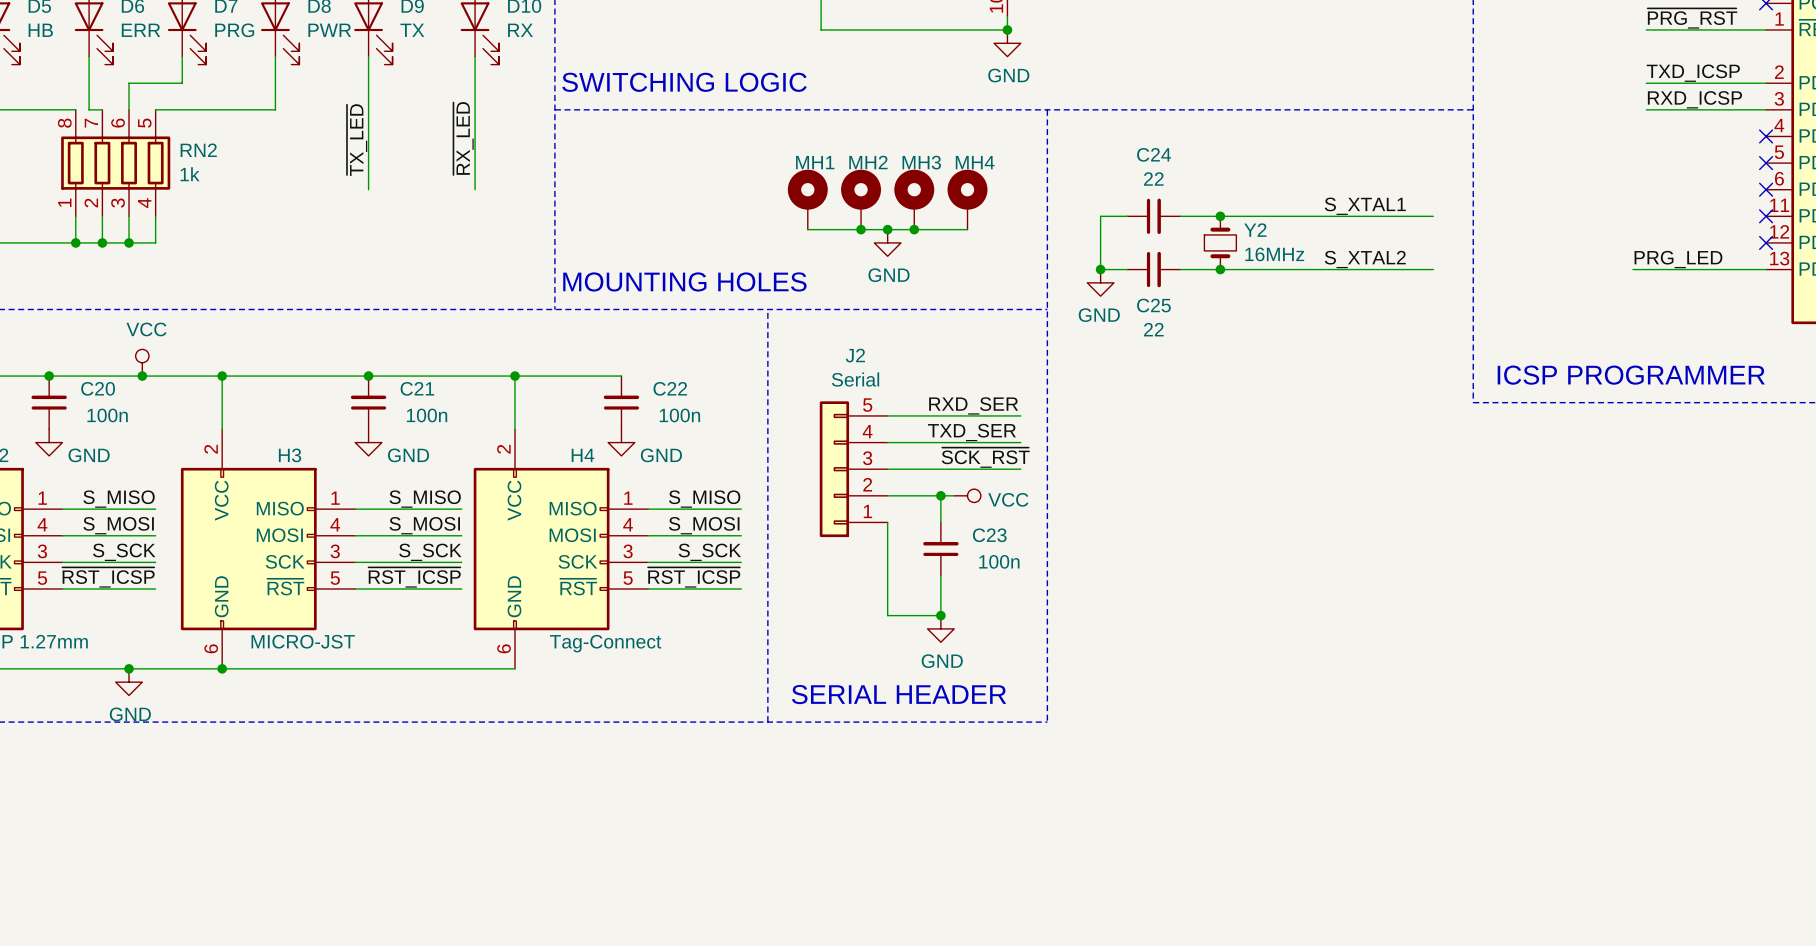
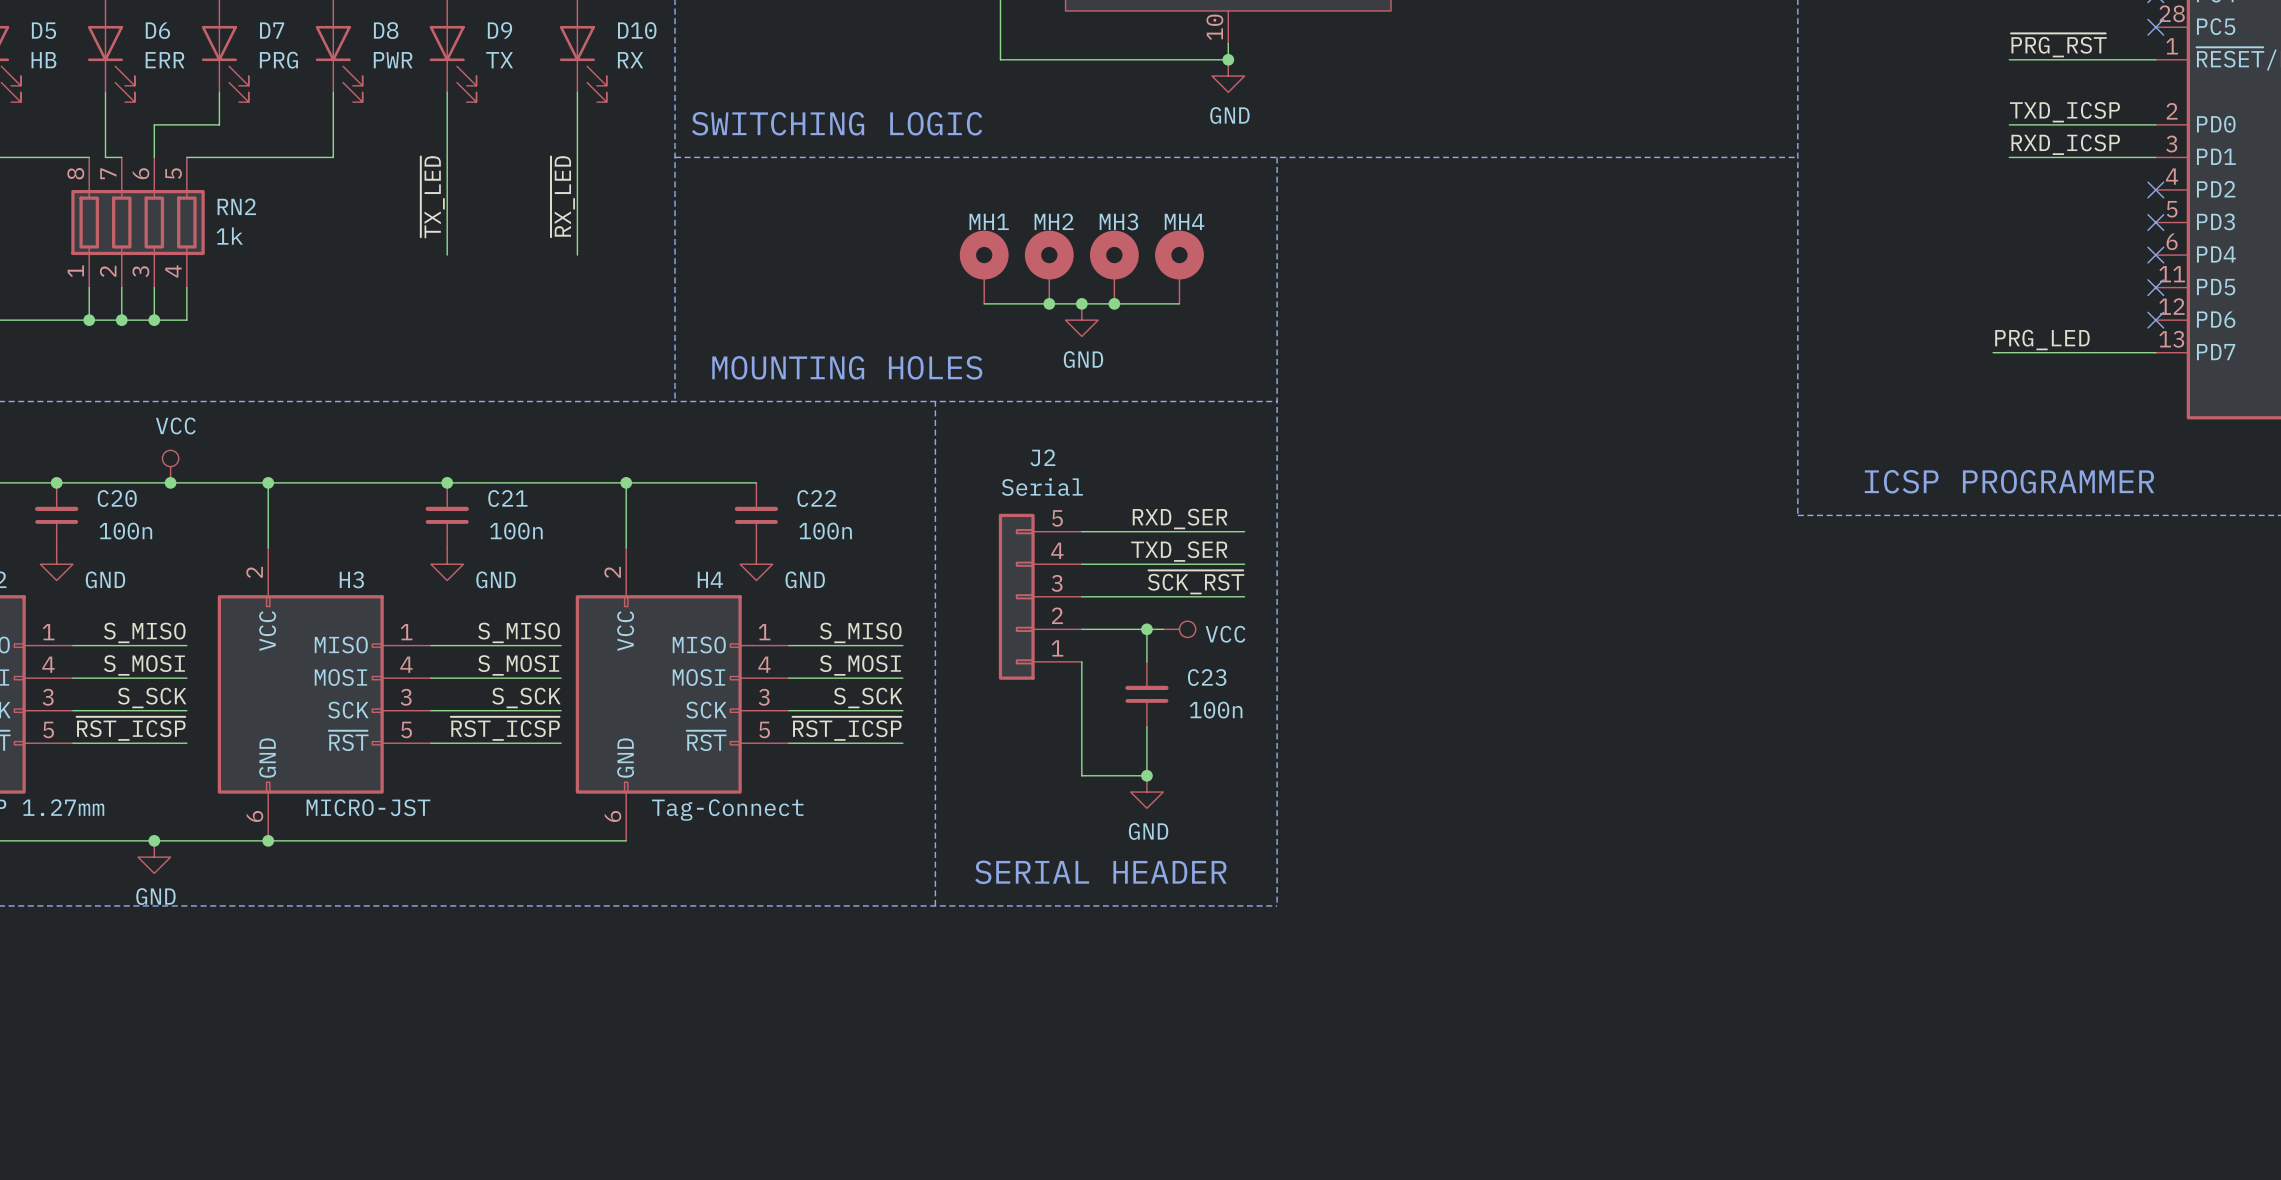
label: S_XTAL1 (1365, 206) -> none
wire: (1127, 216) (1100, 216) (1100, 269) (1127, 269) -> none
C24: 22 (1153, 216) -> none
wire: (1180, 216) (1433, 216) -> none
junction: (1220, 216) -> none
Y2: 16MHz (1220, 242) -> none
label: S_XTAL2 (1365, 259) -> none
junction: (1100, 269) -> none
C25: 22 (1153, 269) -> none
wire: (1180, 269) (1433, 269) -> none
junction: (1220, 269) -> none
power symbol: GND (1100, 282) -> none

